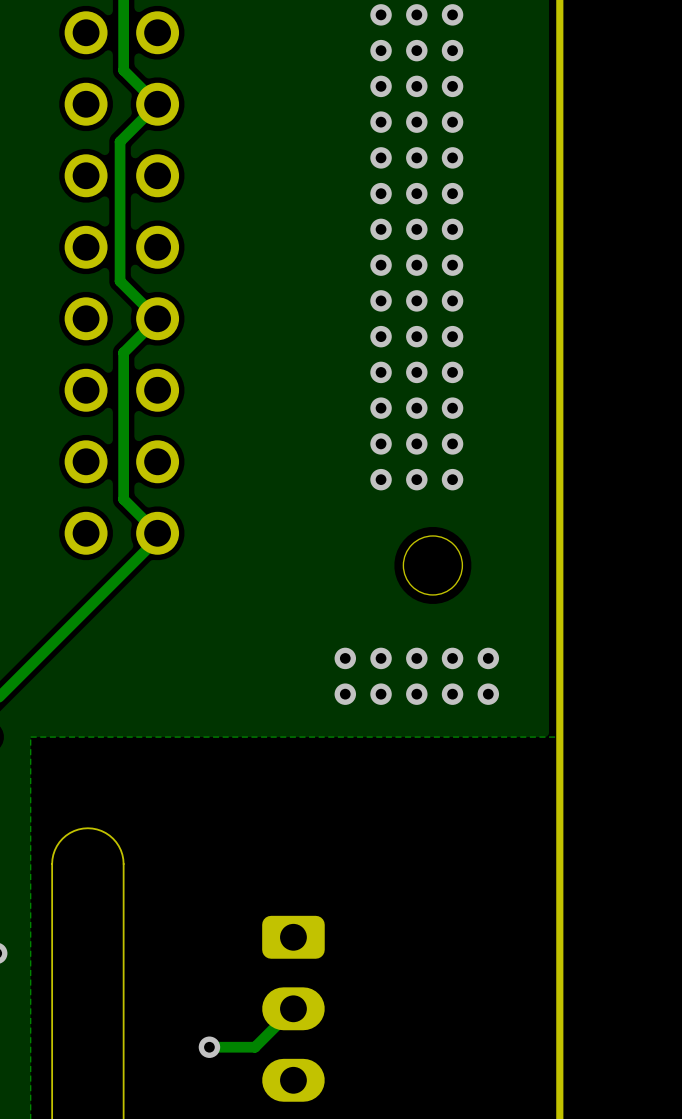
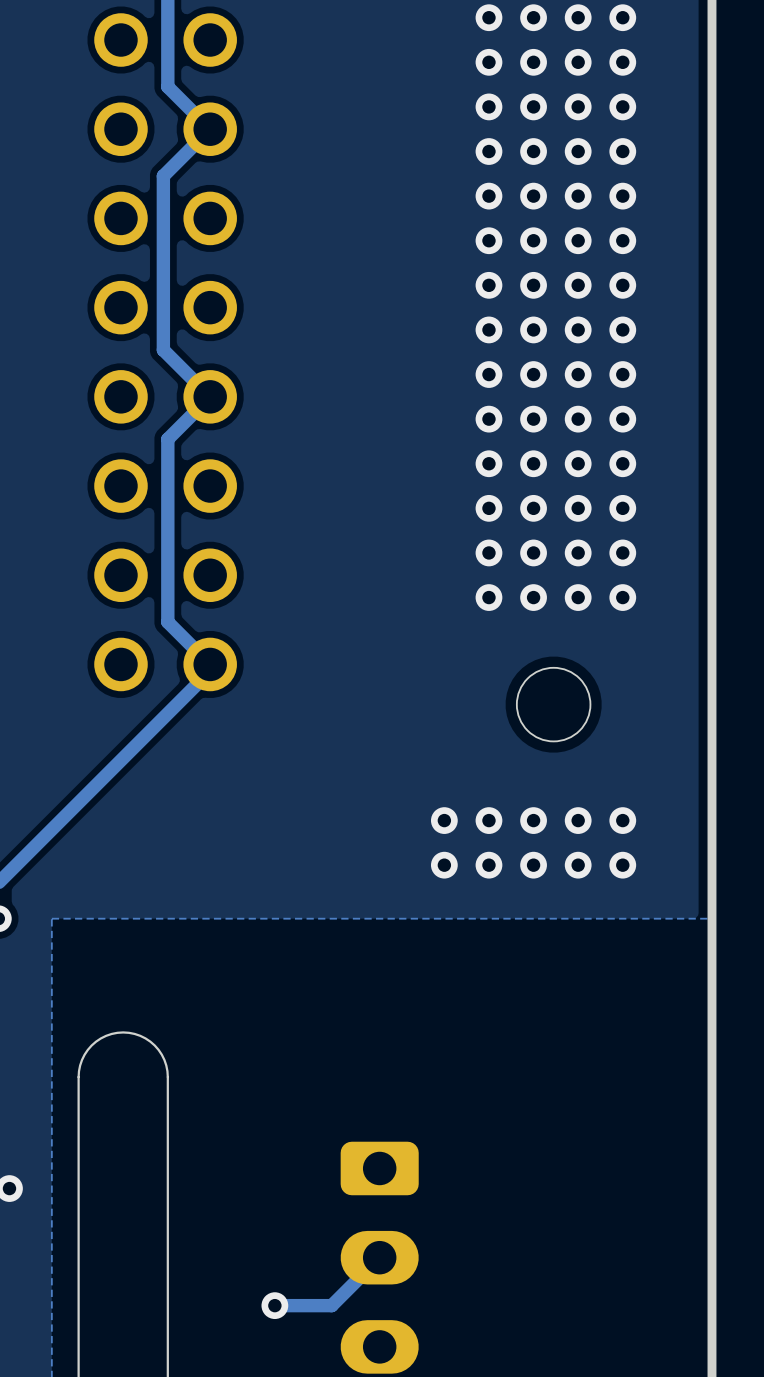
via: none -> (622, 17)
via: none -> (622, 62)
via: none -> (622, 106)
via: none -> (622, 151)
via: none -> (622, 196)
via: none -> (622, 240)
via: none -> (622, 285)
via: none -> (622, 329)
via: none -> (622, 374)
via: none -> (622, 419)
via: none -> (622, 463)
via: none -> (622, 508)
via: none -> (622, 552)
via: none -> (622, 597)

